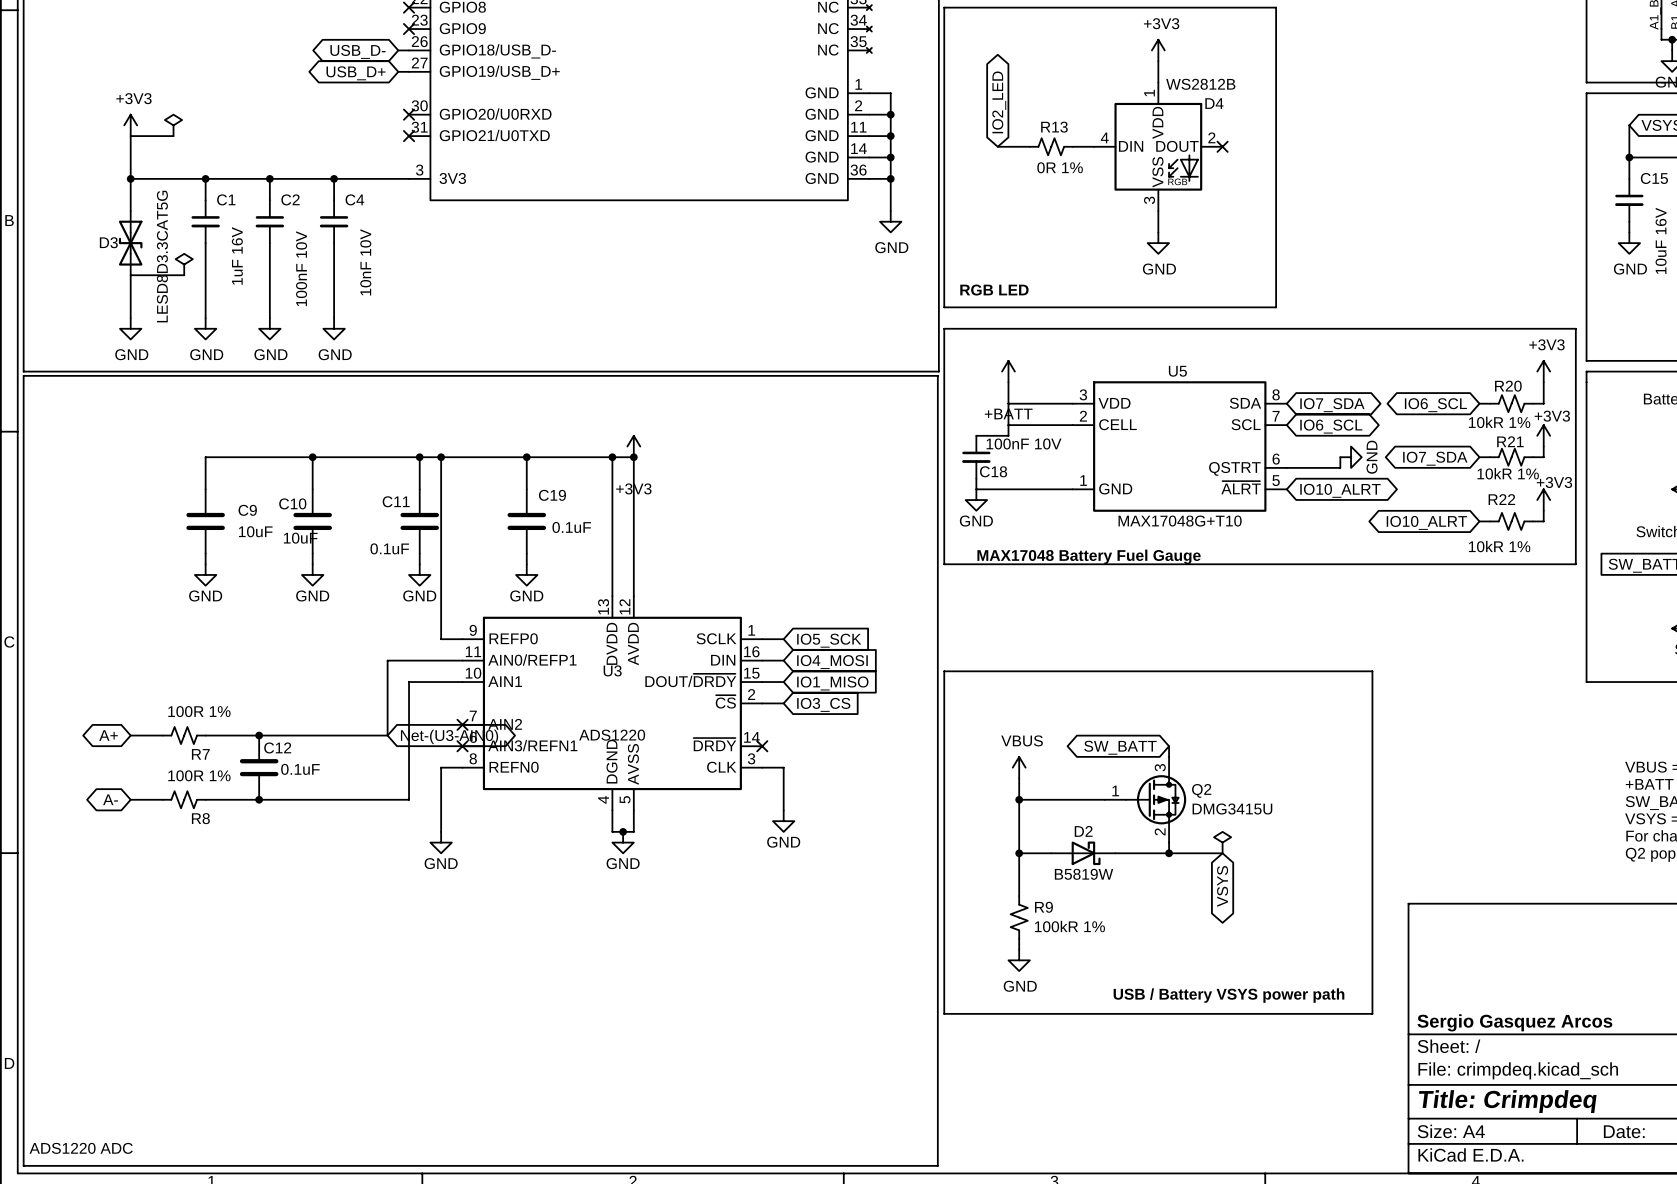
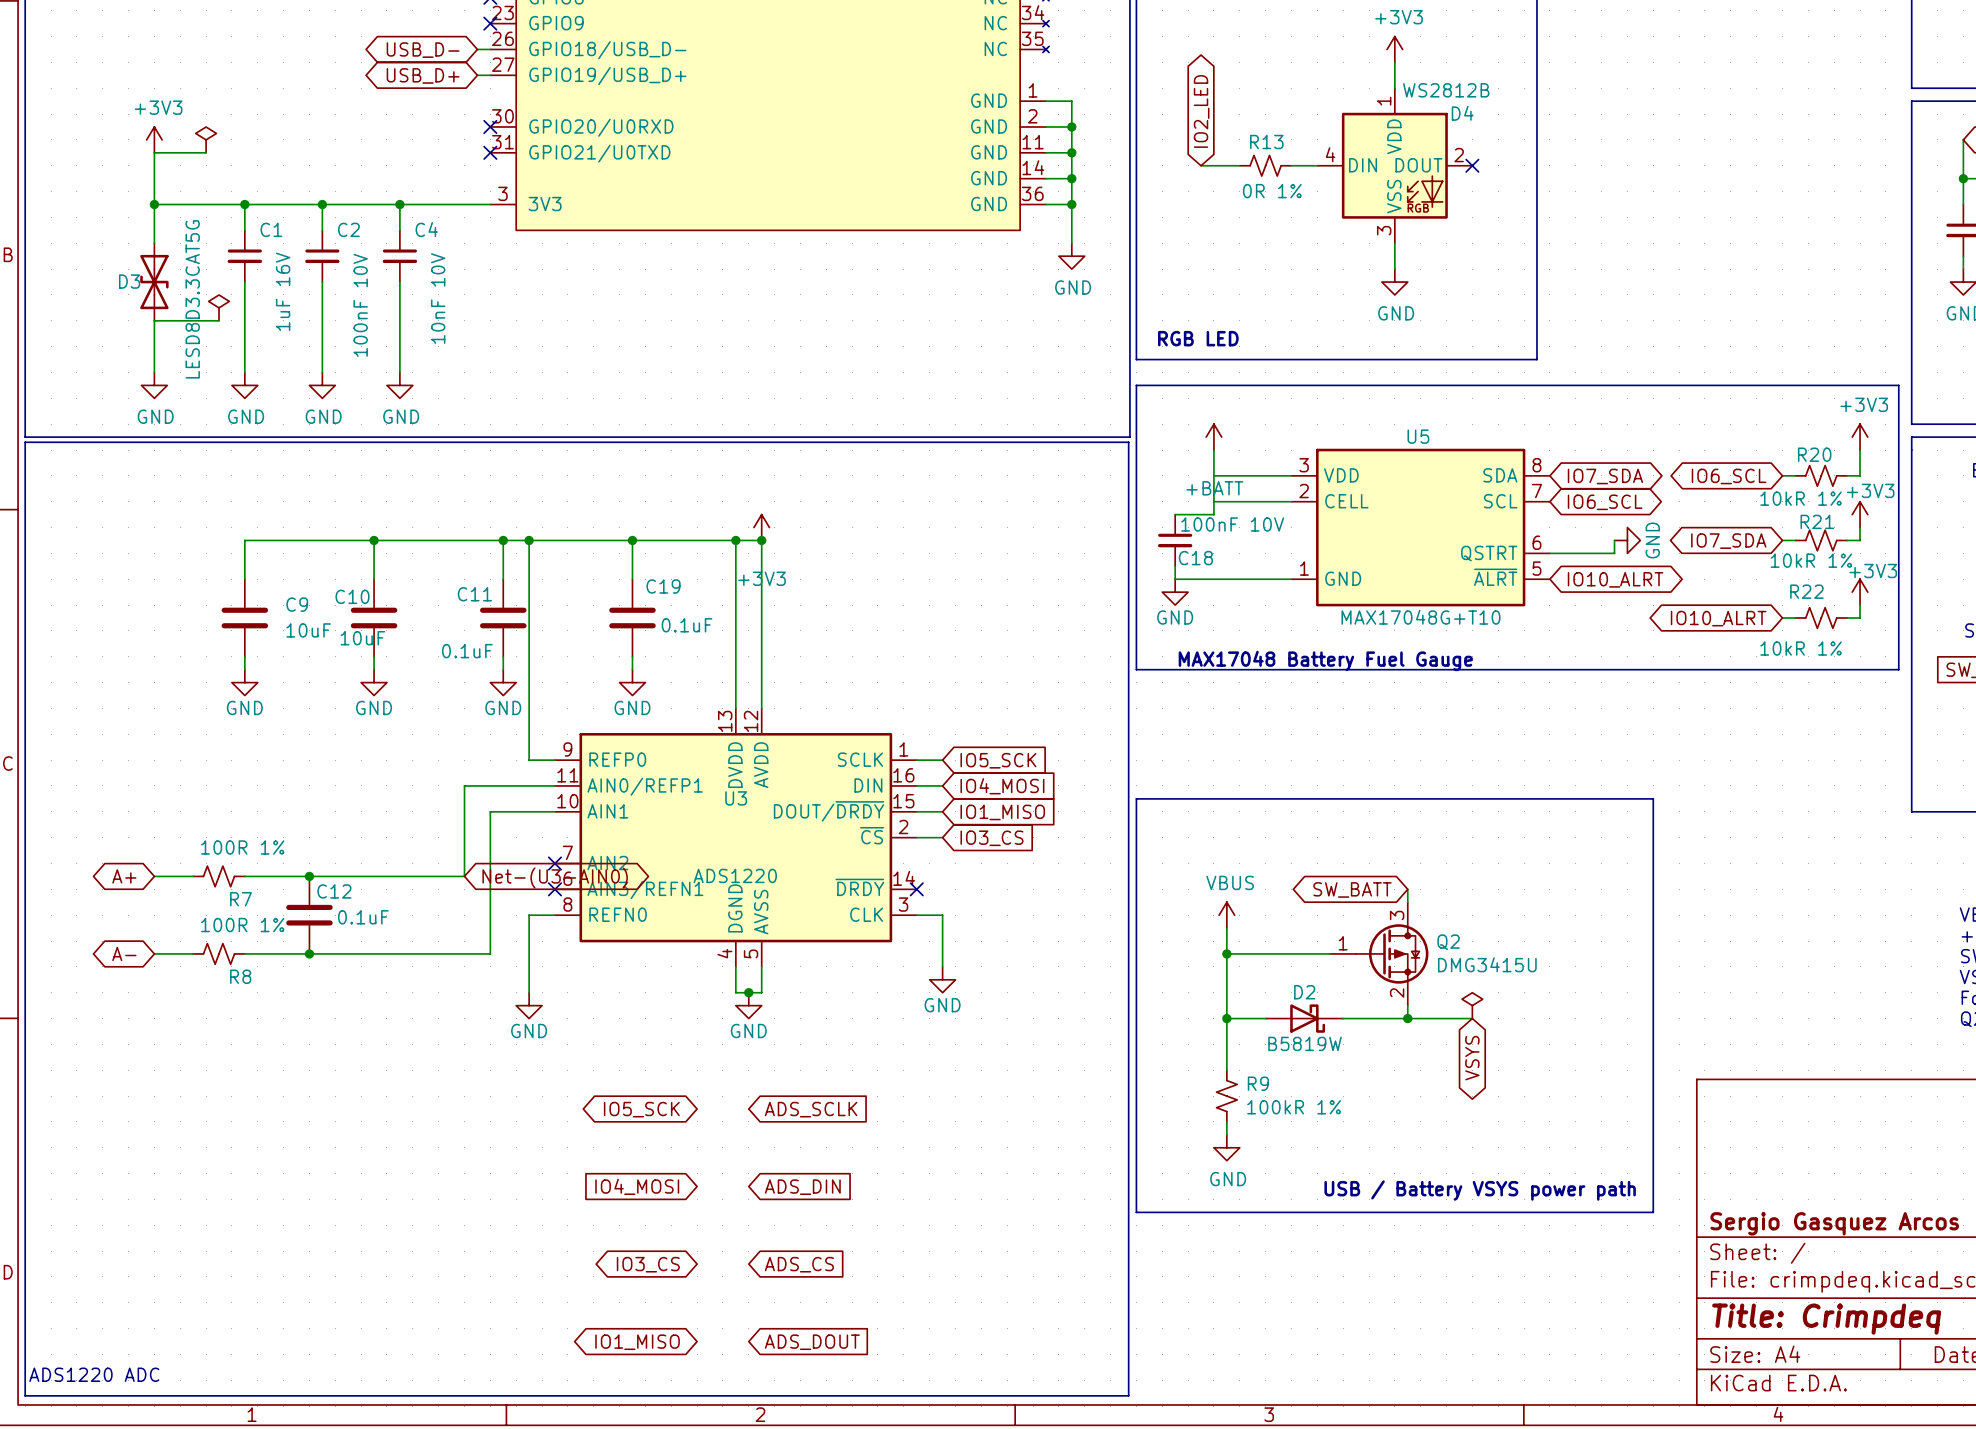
global label: none -> IO5_SCK (641, 1109)
global label: none -> ADS_SCLK (811, 1109)
global label: none -> IO4_MOSI (637, 1186)
global label: none -> ADS_DIN (802, 1187)
global label: none -> IO3_CS (648, 1264)
global label: none -> ADS_CS (799, 1264)
global label: none -> IO1_MISO (637, 1342)
global label: none -> ADS_DOUT (812, 1342)

